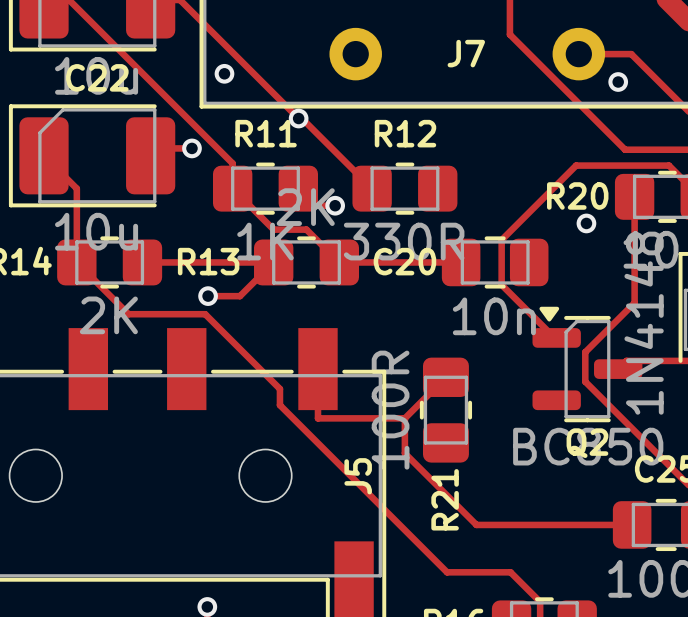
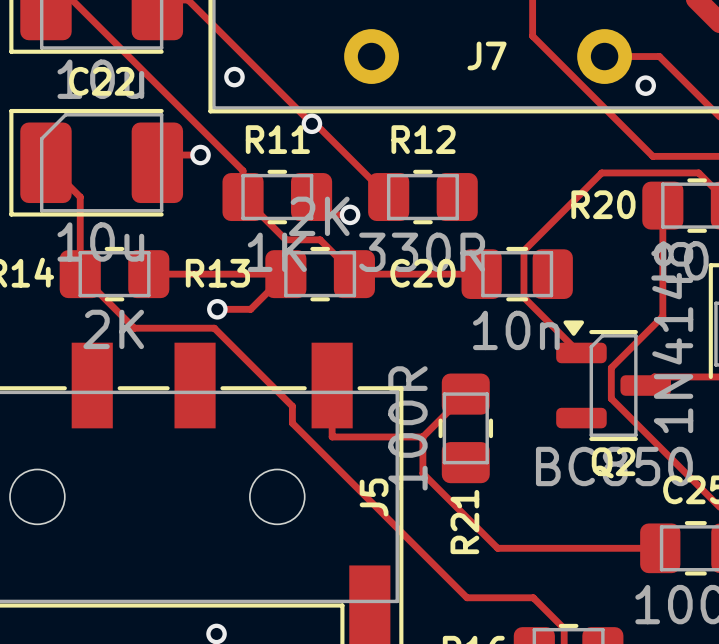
via: (586, 223) -> none

